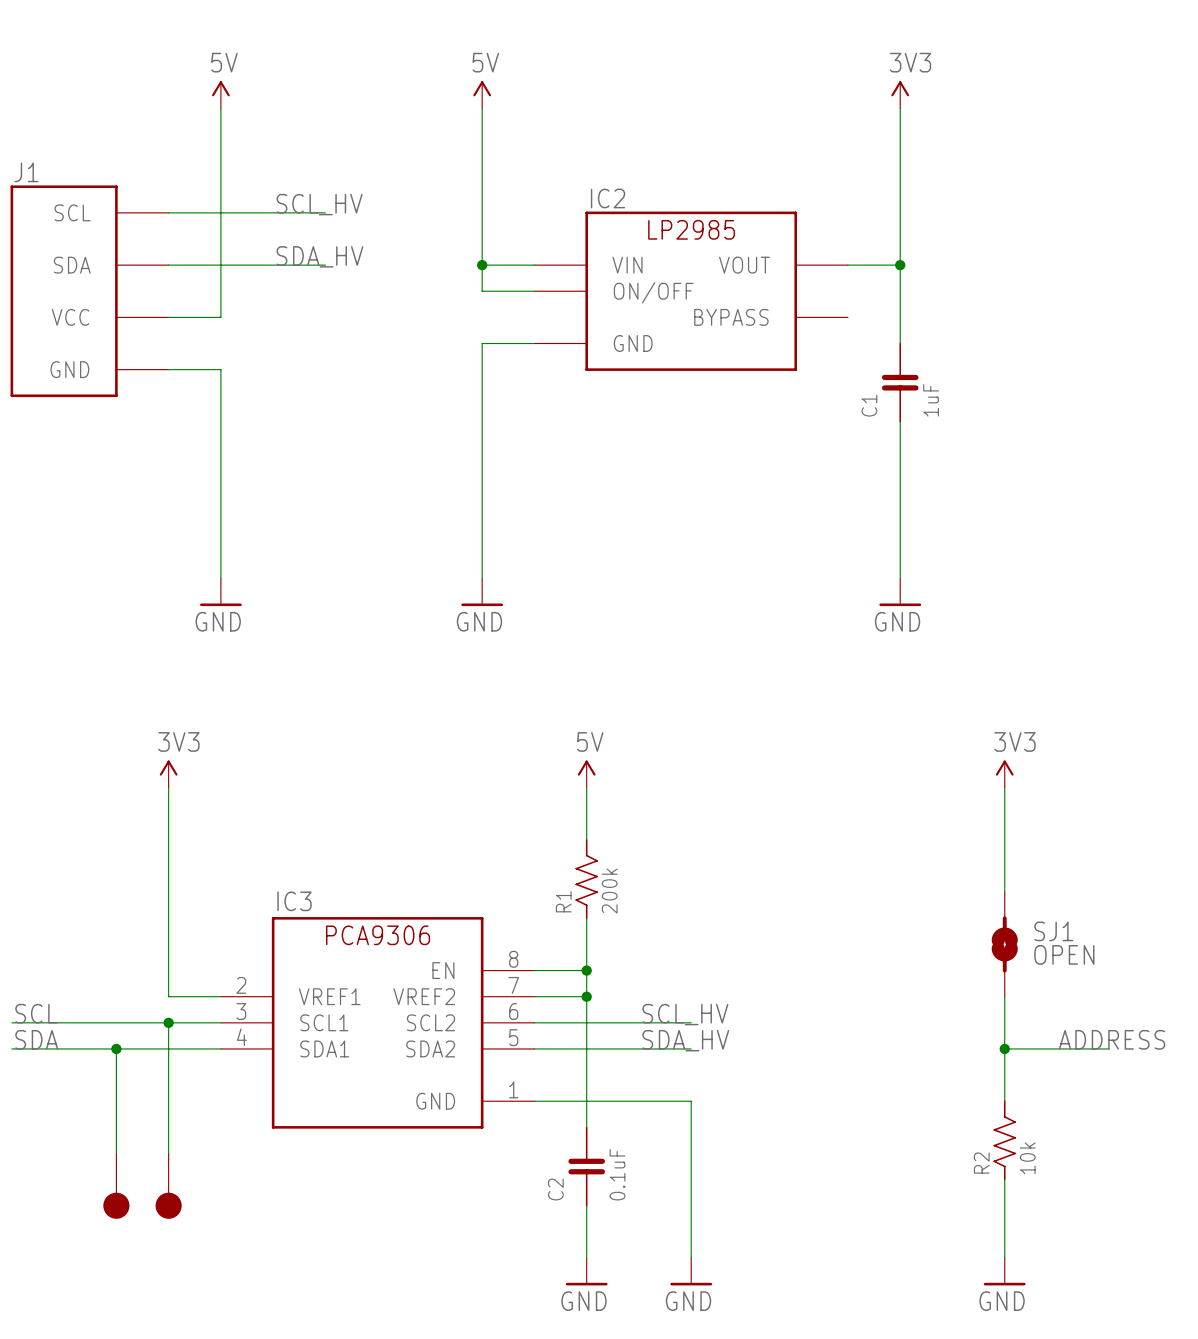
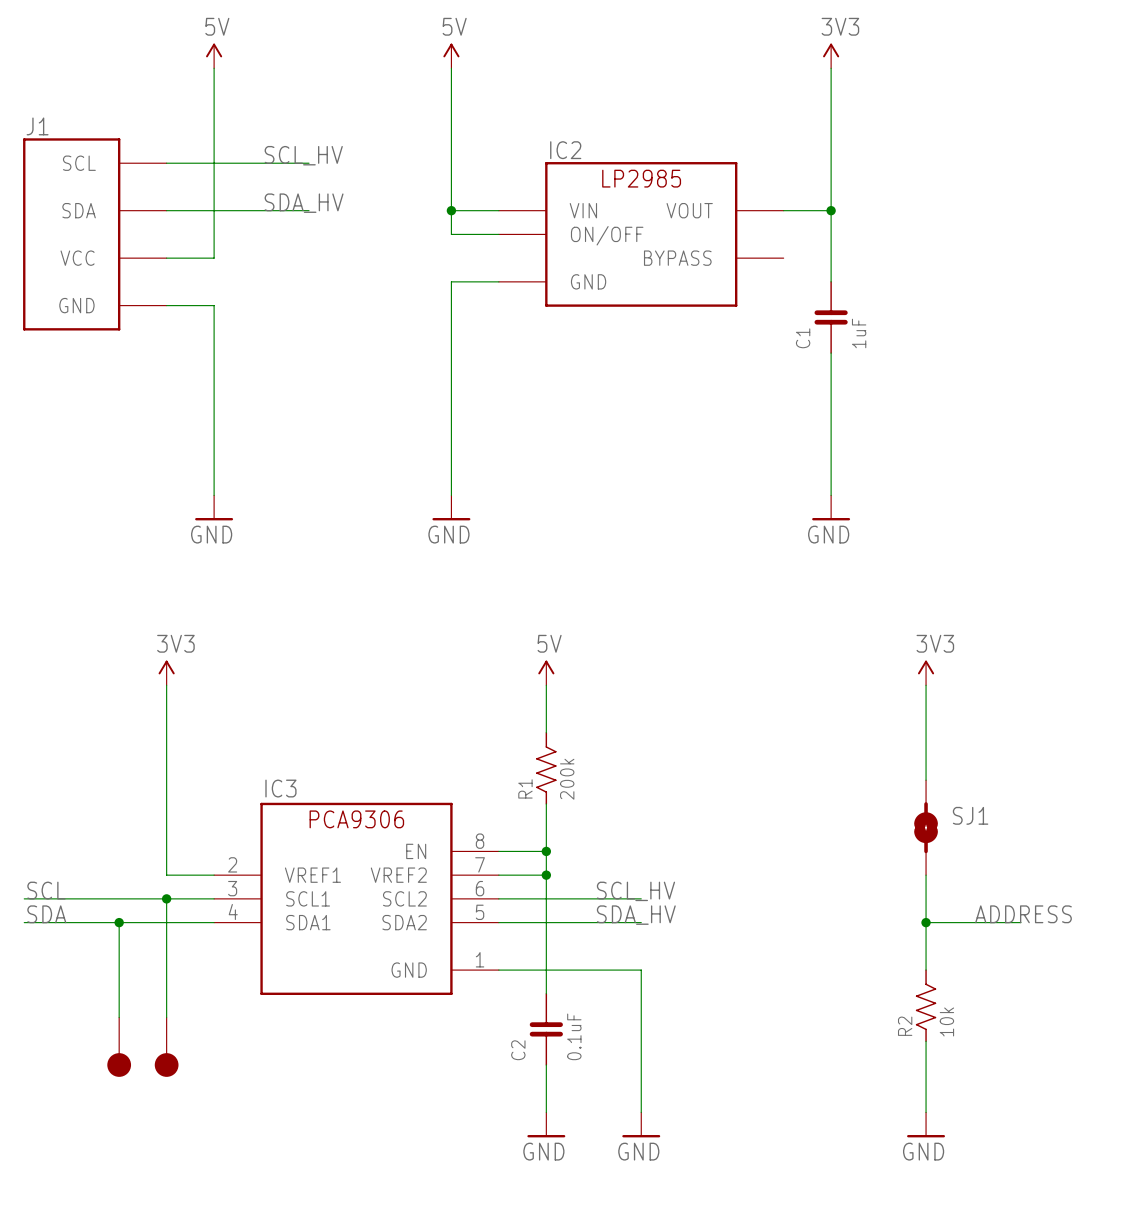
SJ1 value: OPEN (1064, 954) -> none

